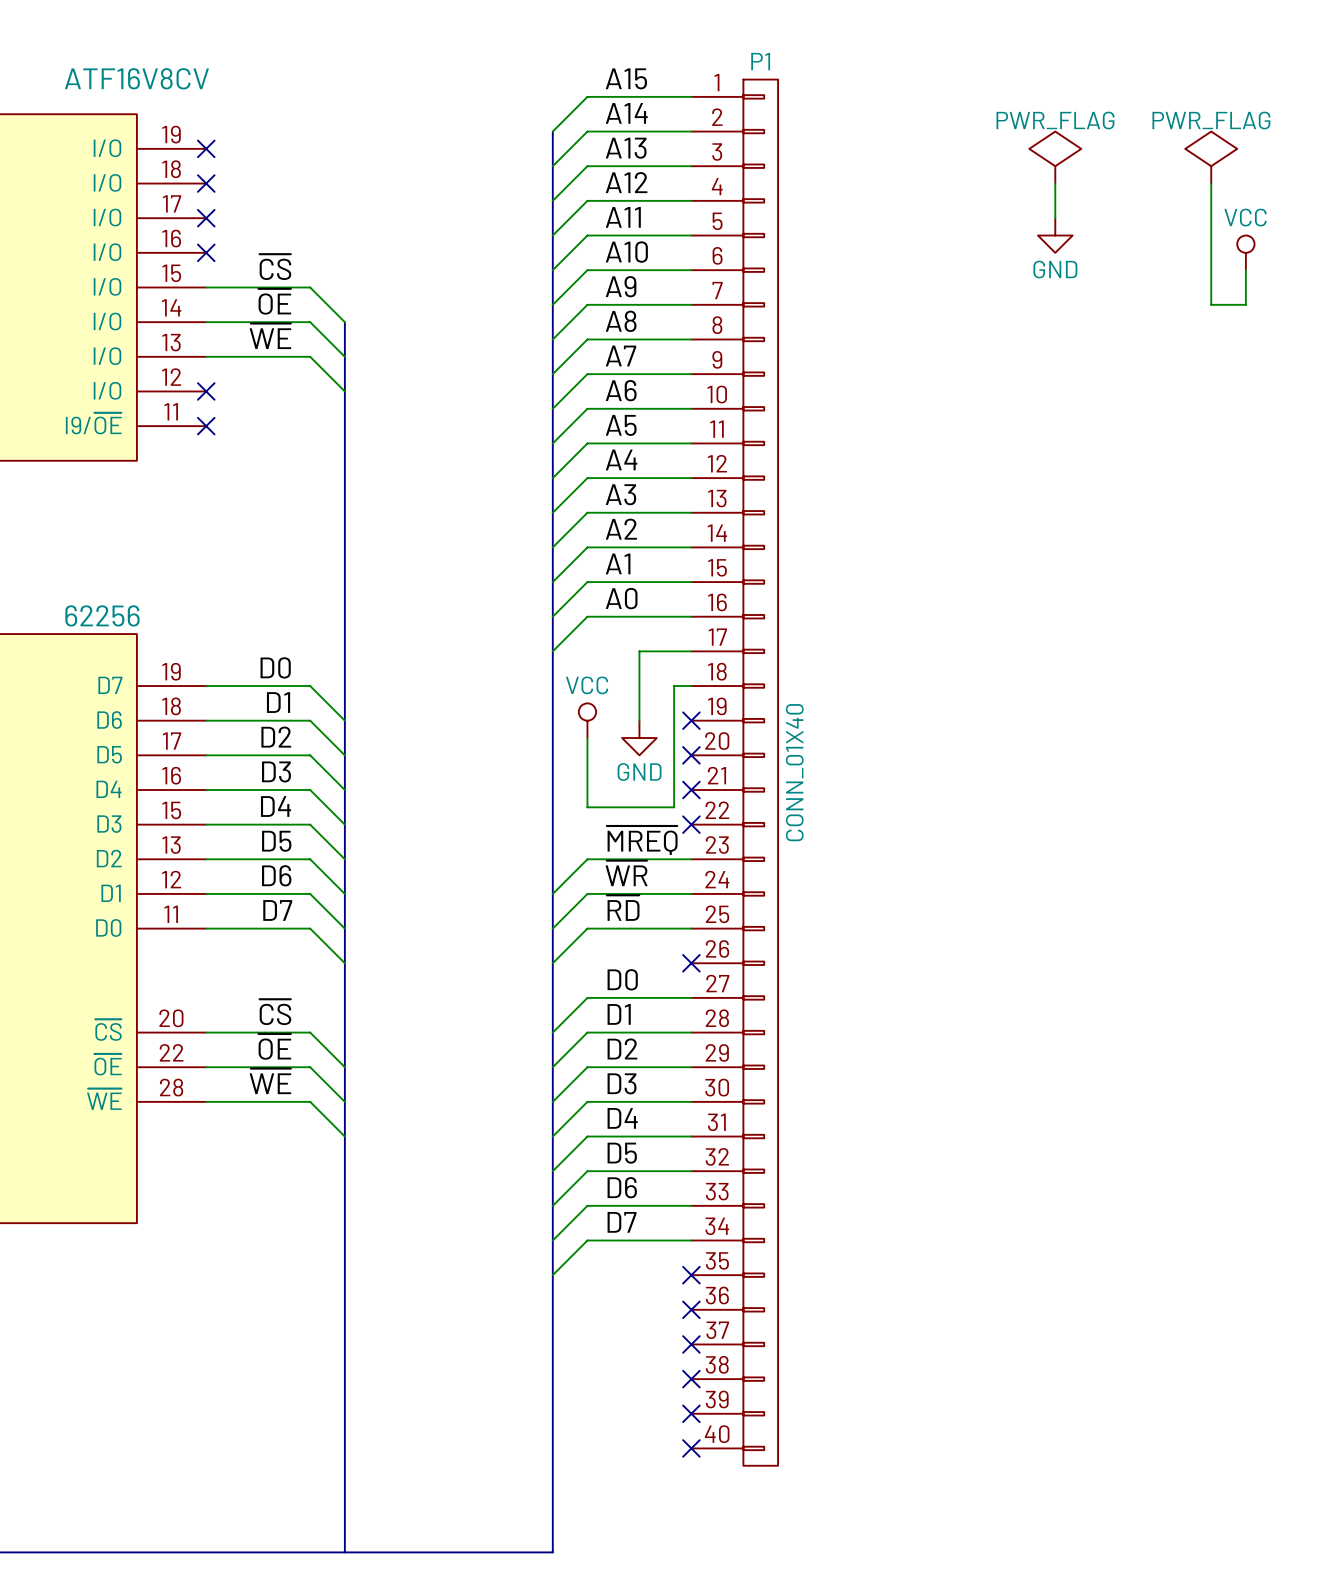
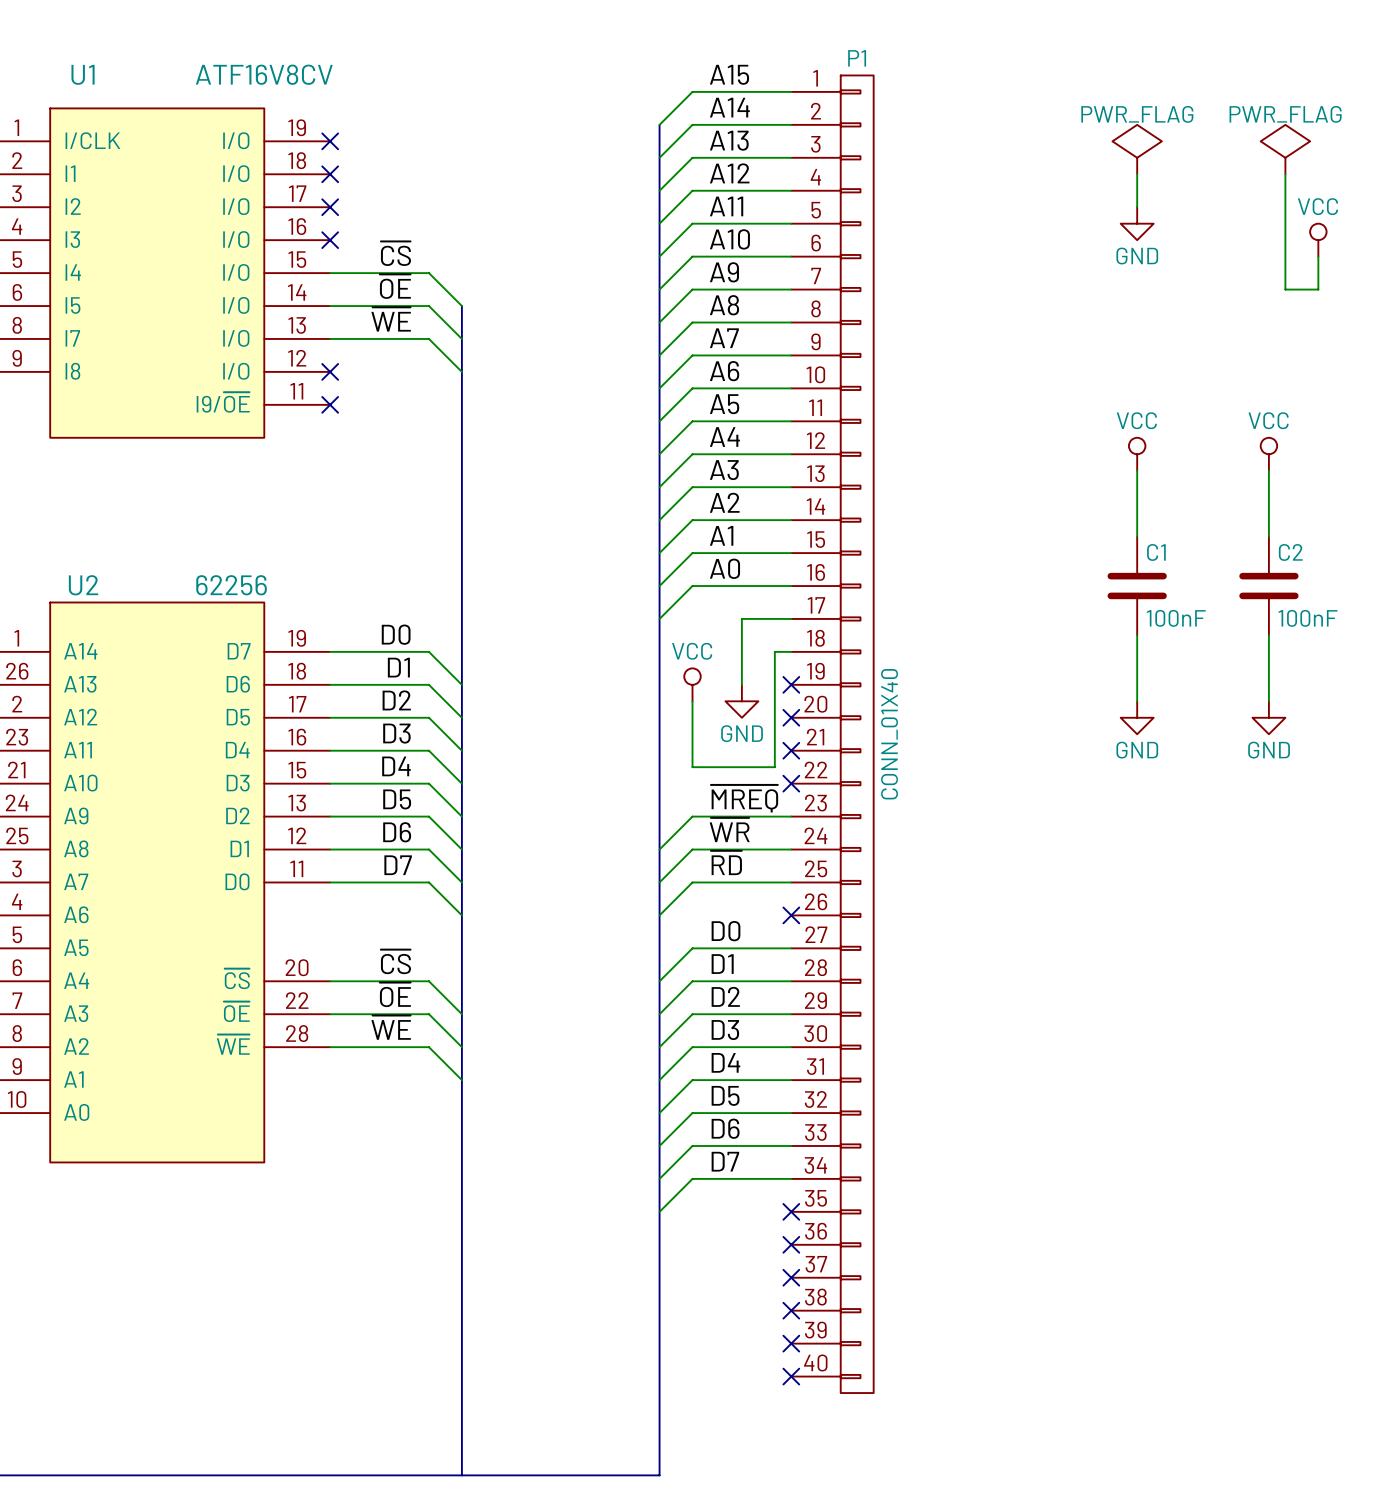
power symbol: none -> VCC (1137, 454)
power symbol: none -> VCC (1268, 454)
wire: none -> (1137, 470) (1137, 536)
wire: none -> (1268, 470) (1268, 536)
C1: none -> 100nF (1137, 586)
C2: none -> 100nF (1268, 586)
wire: none -> (1137, 635) (1137, 701)
wire: none -> (1268, 635) (1268, 701)
power symbol: none -> GND (1137, 717)
power symbol: none -> GND (1268, 717)

